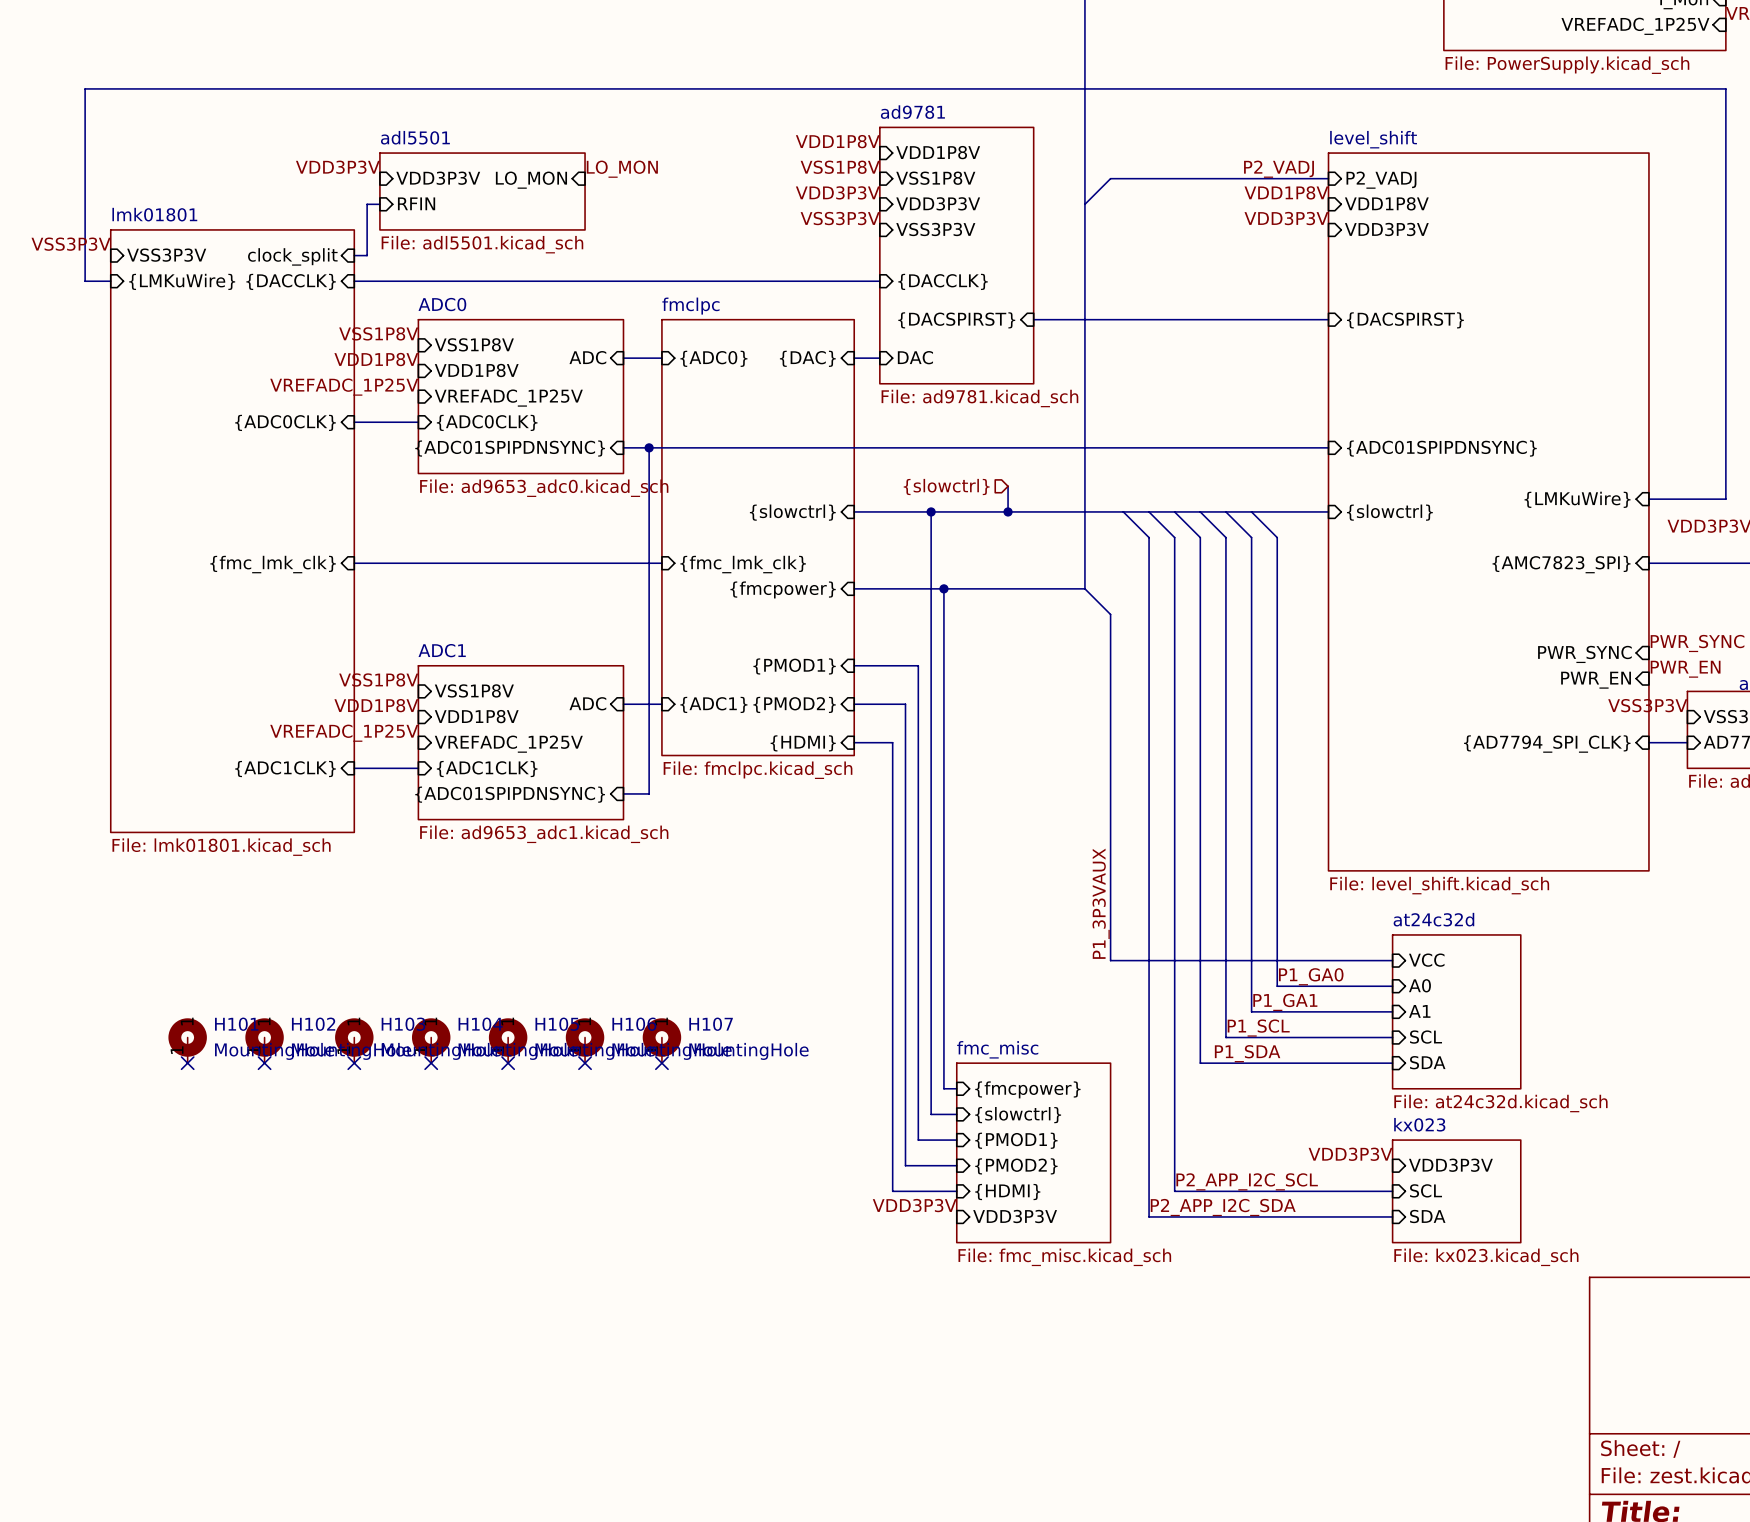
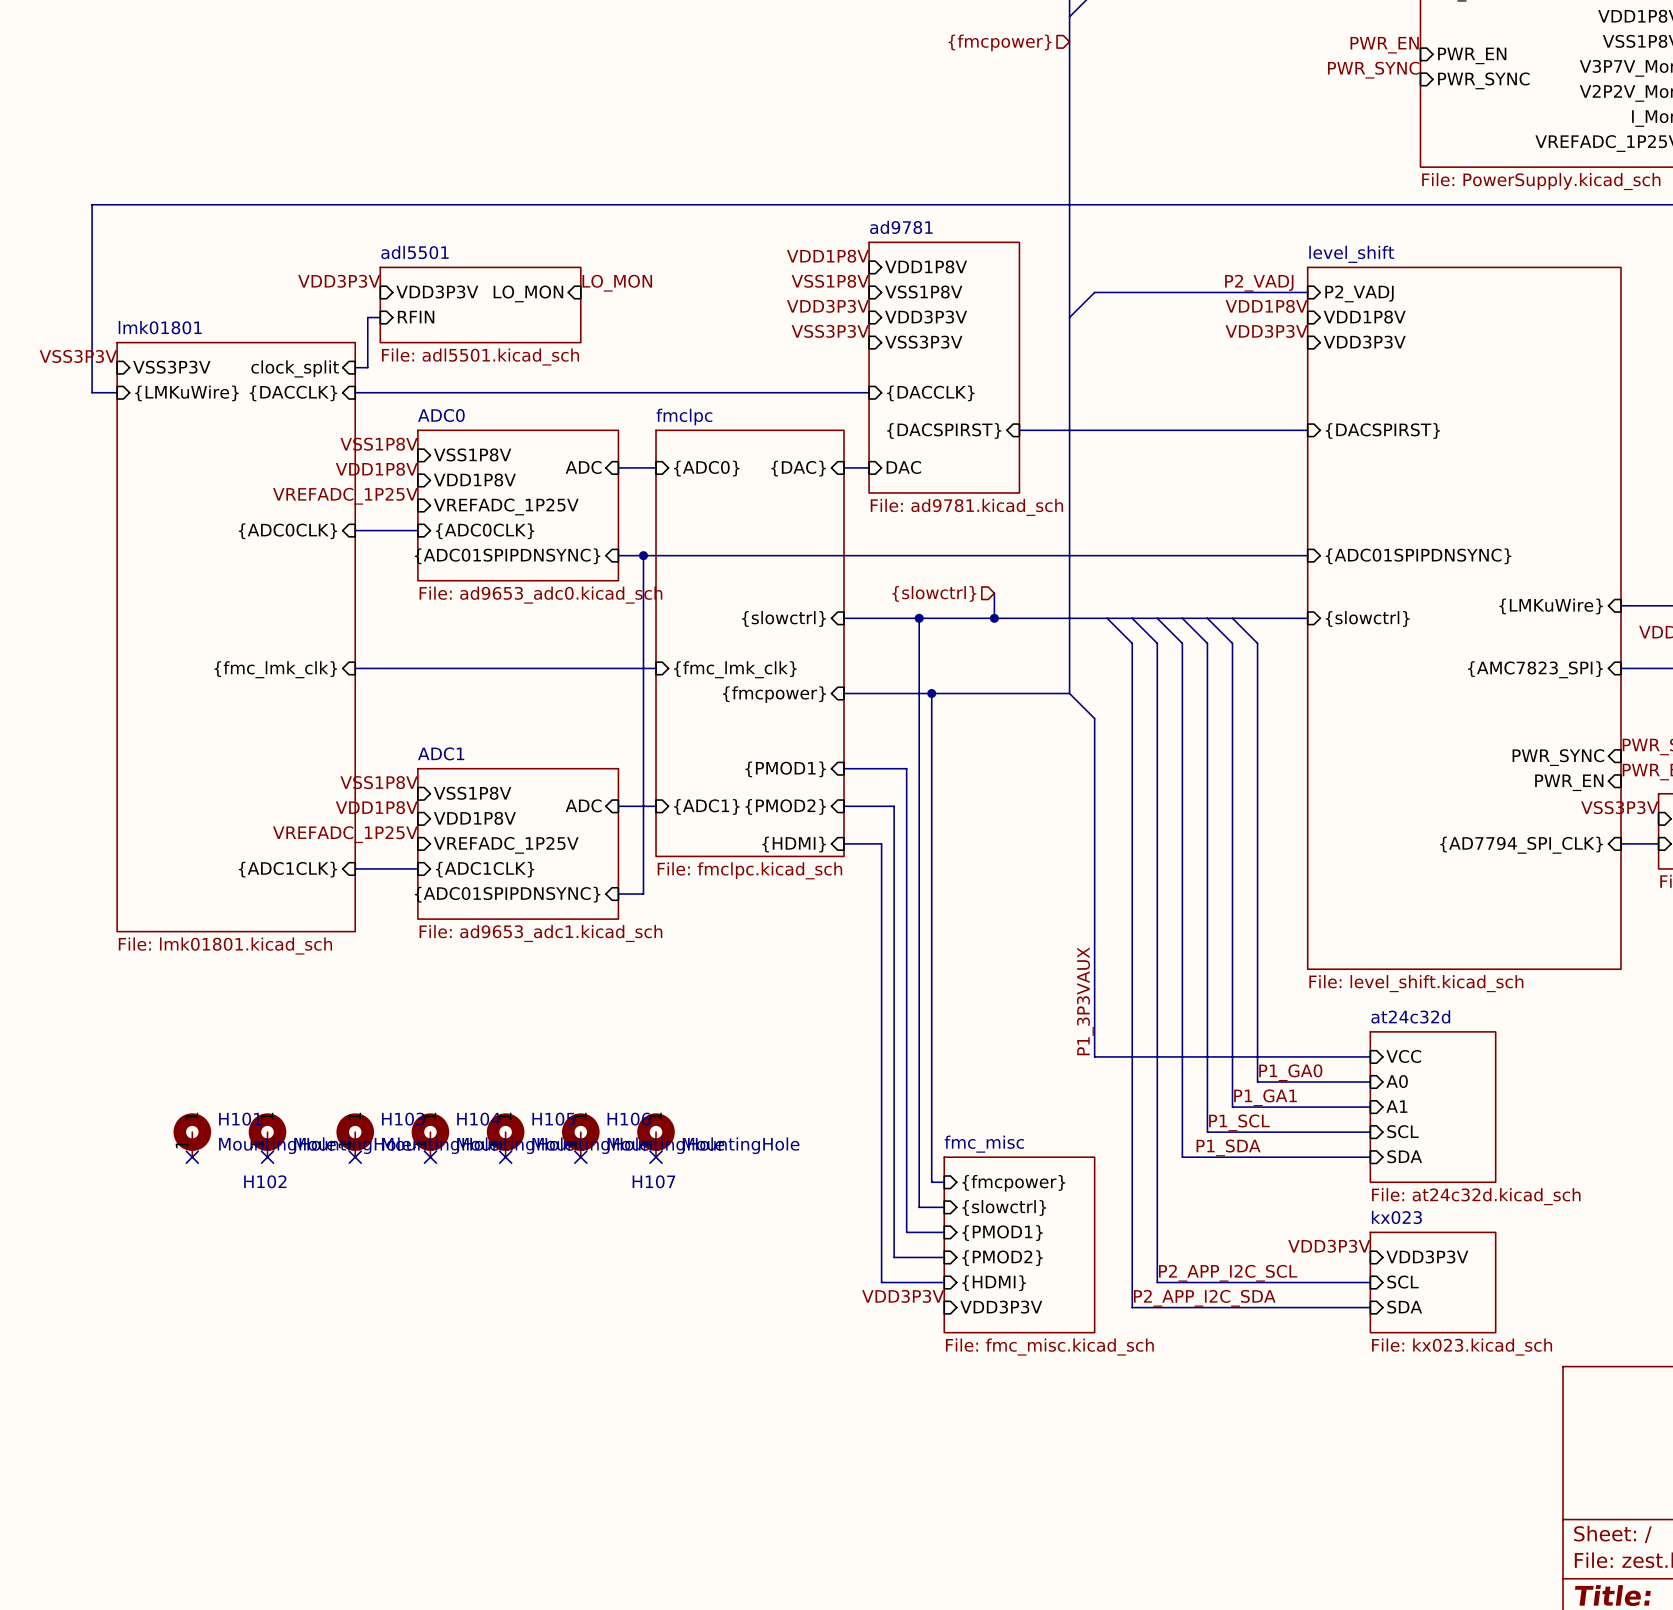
H102 name position: H102 (313, 1024) -> H102 (265, 1181)
H107 name position: H107 (711, 1024) -> H107 (653, 1181)

